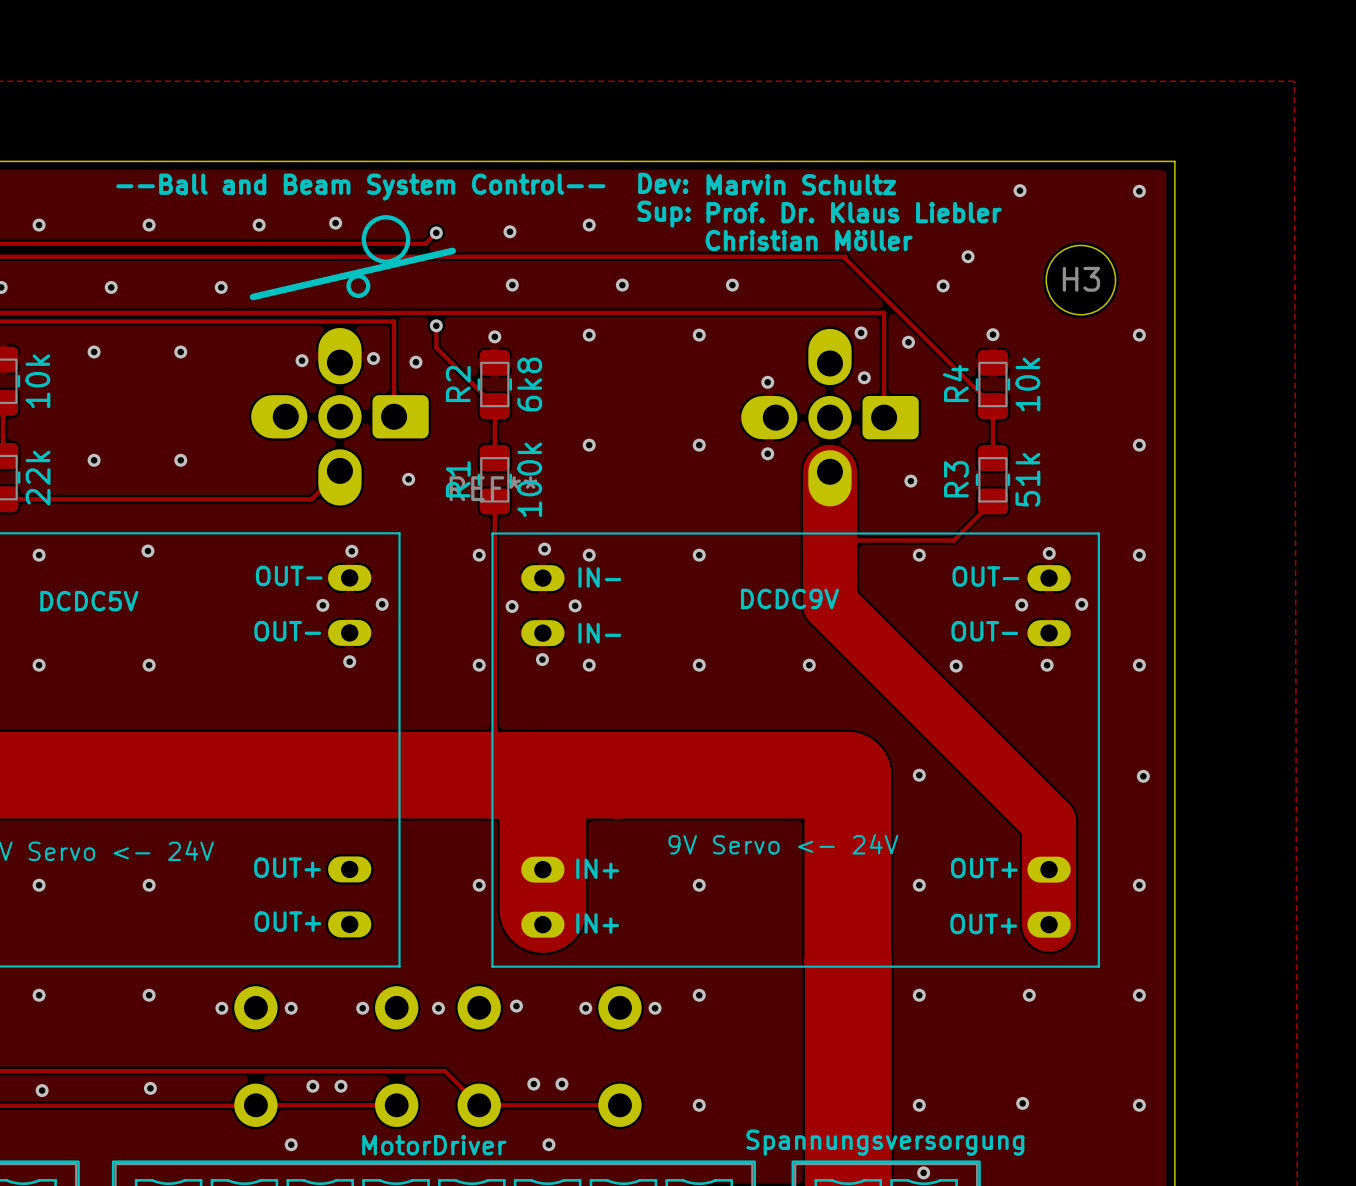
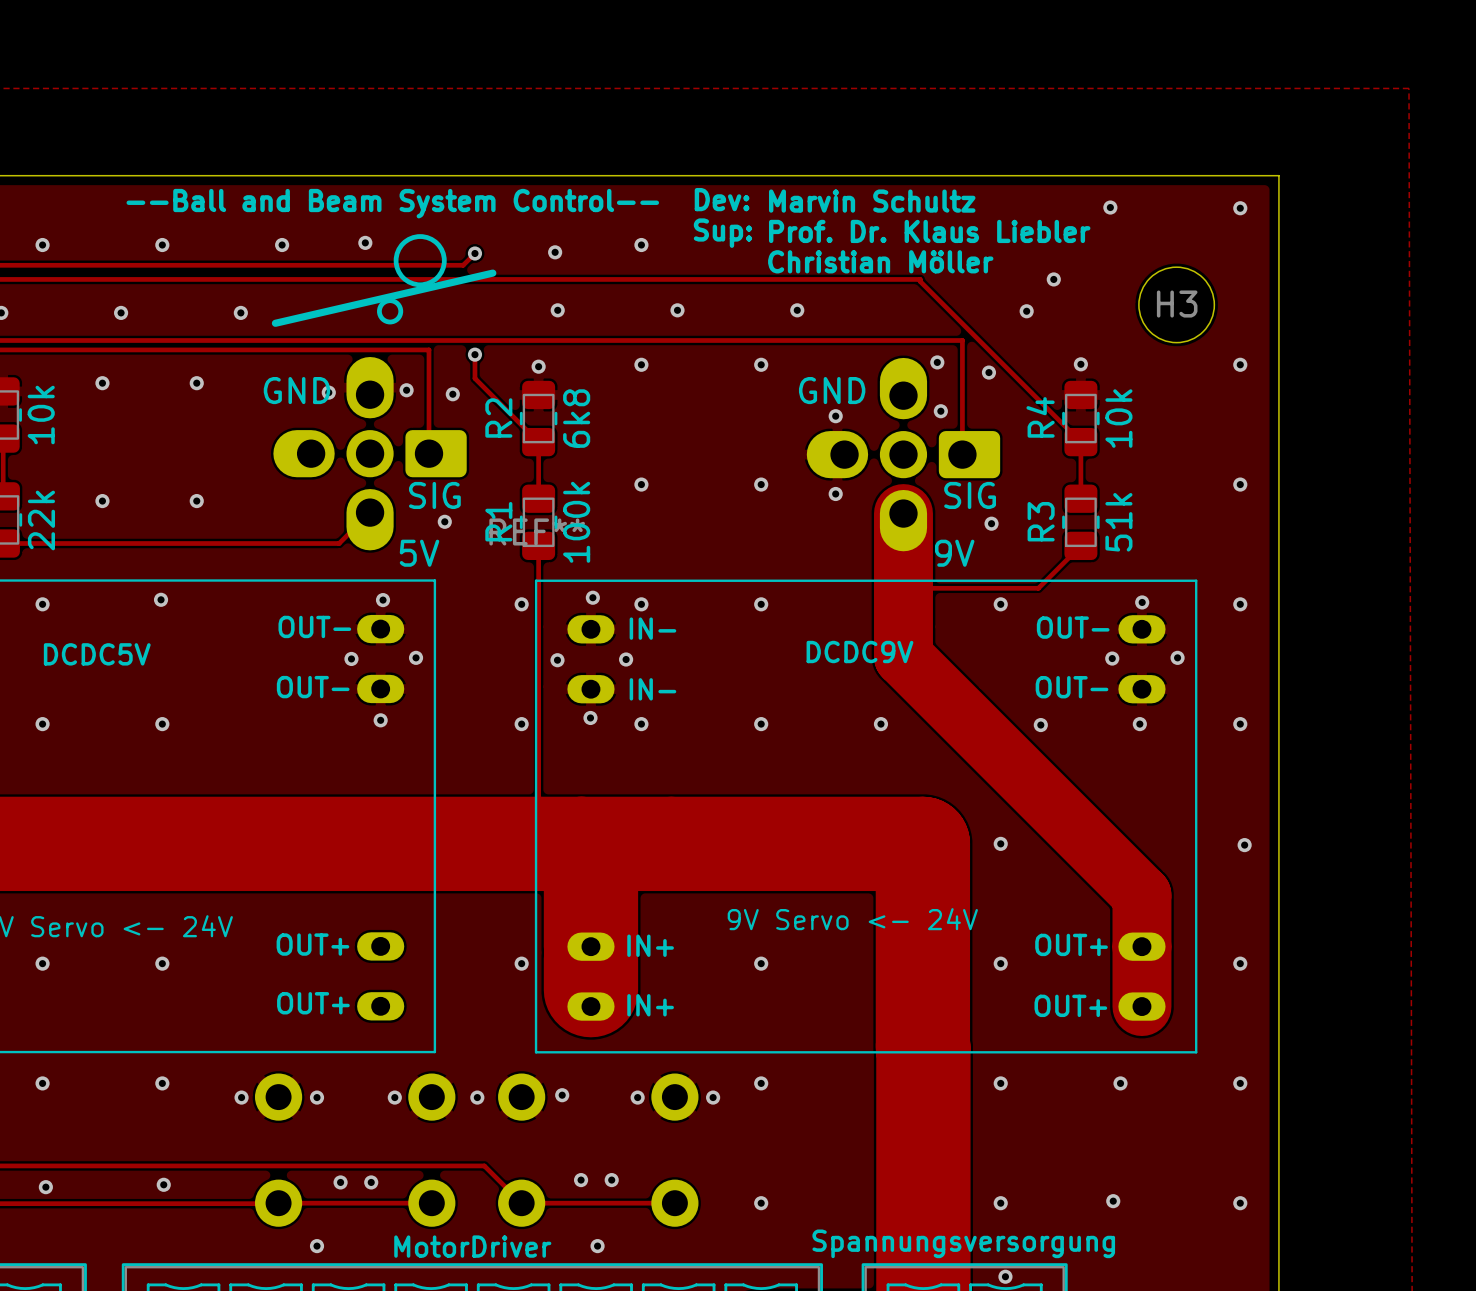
text: none -> GND (296, 390)
text: none -> GND (832, 390)
text: none -> SIG (434, 495)
text: none -> SIG (970, 495)
text: none -> 5V (419, 553)
text: none -> 9V (954, 553)

